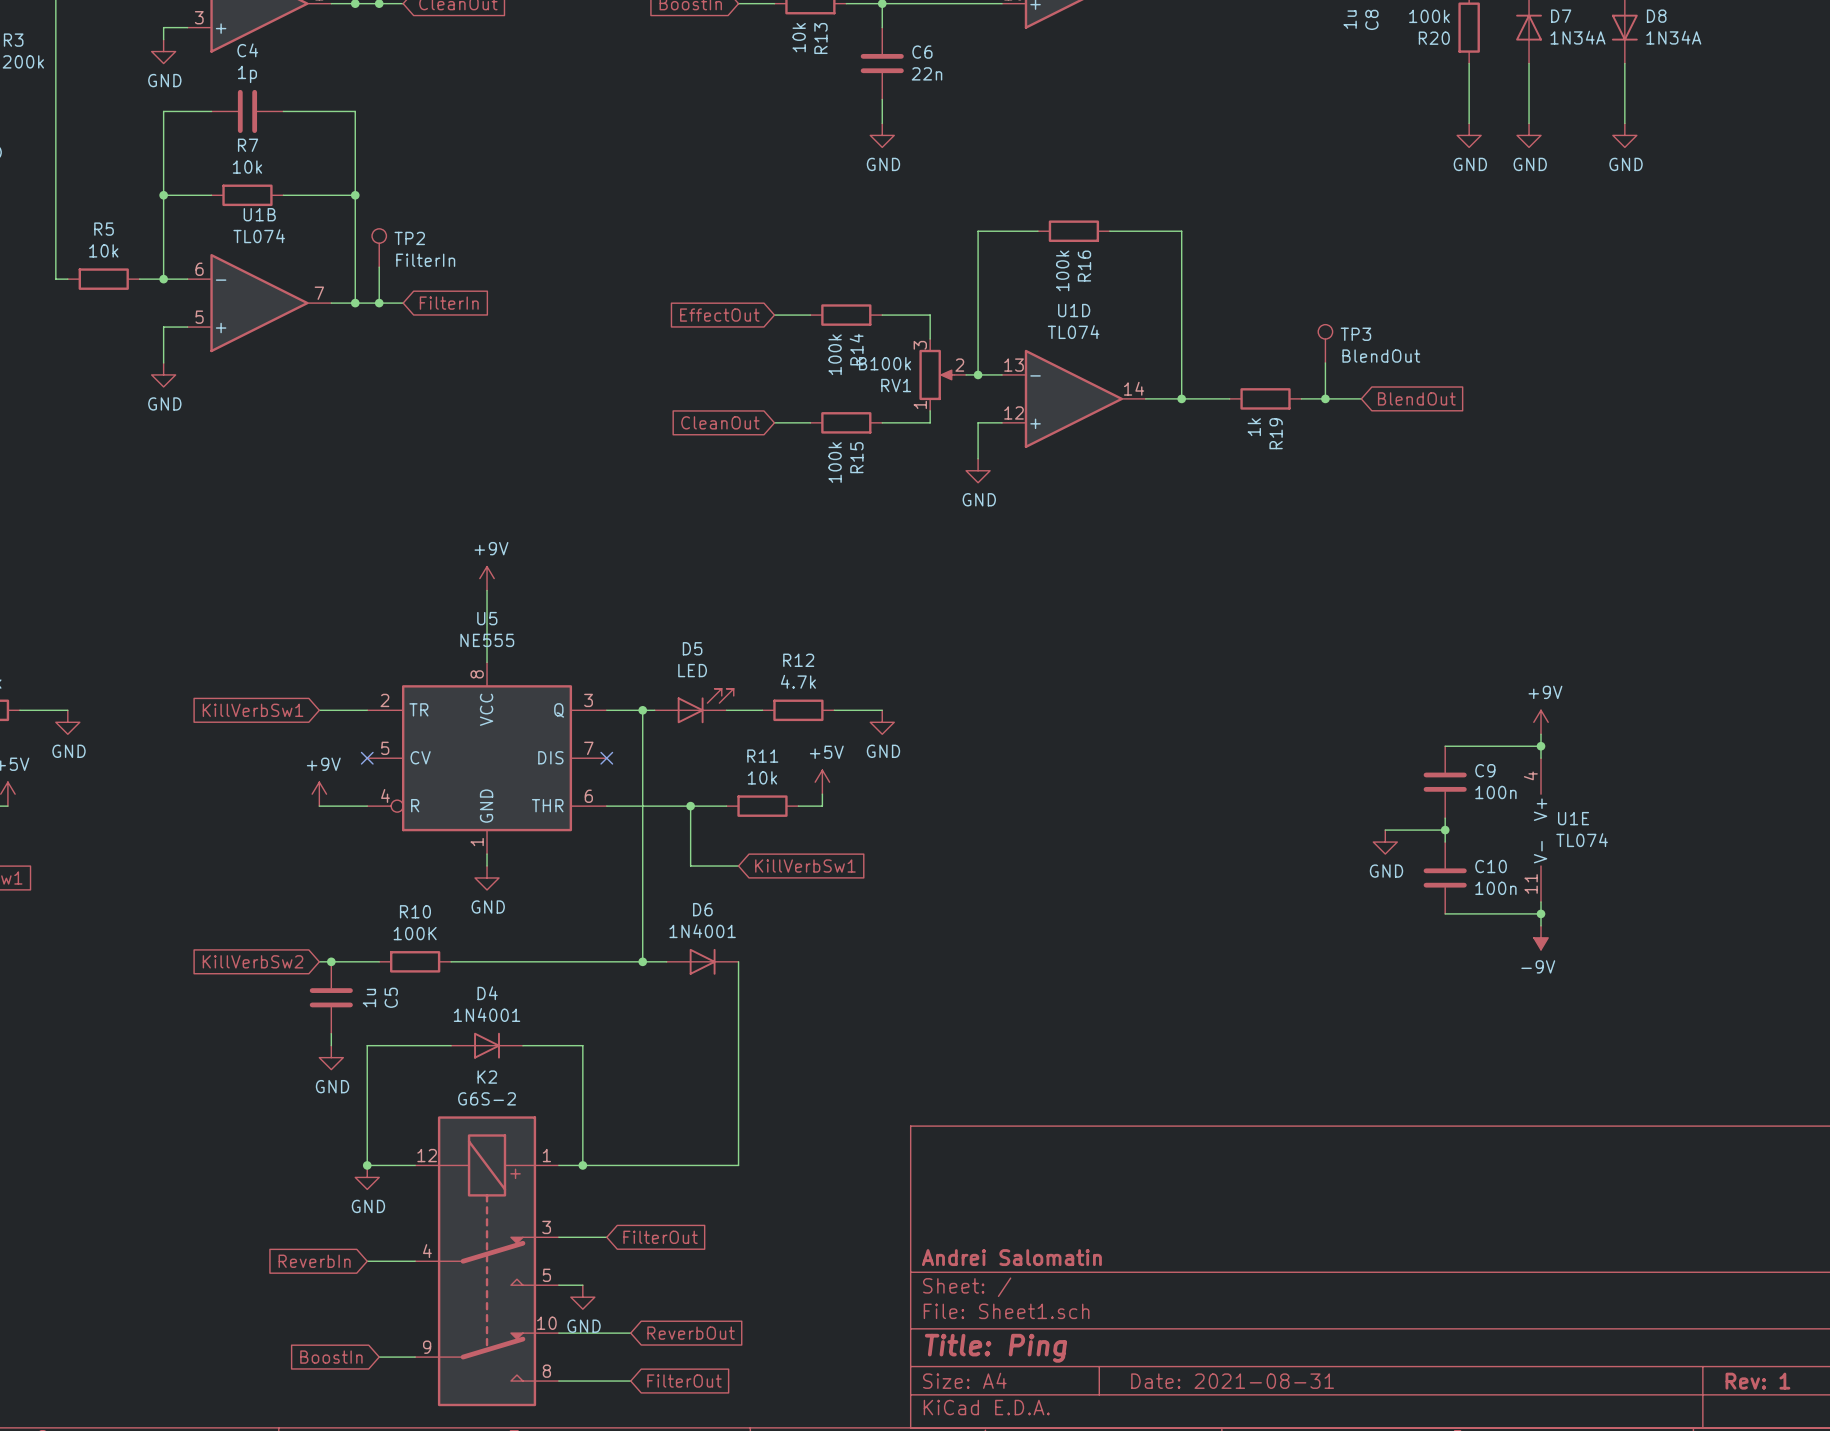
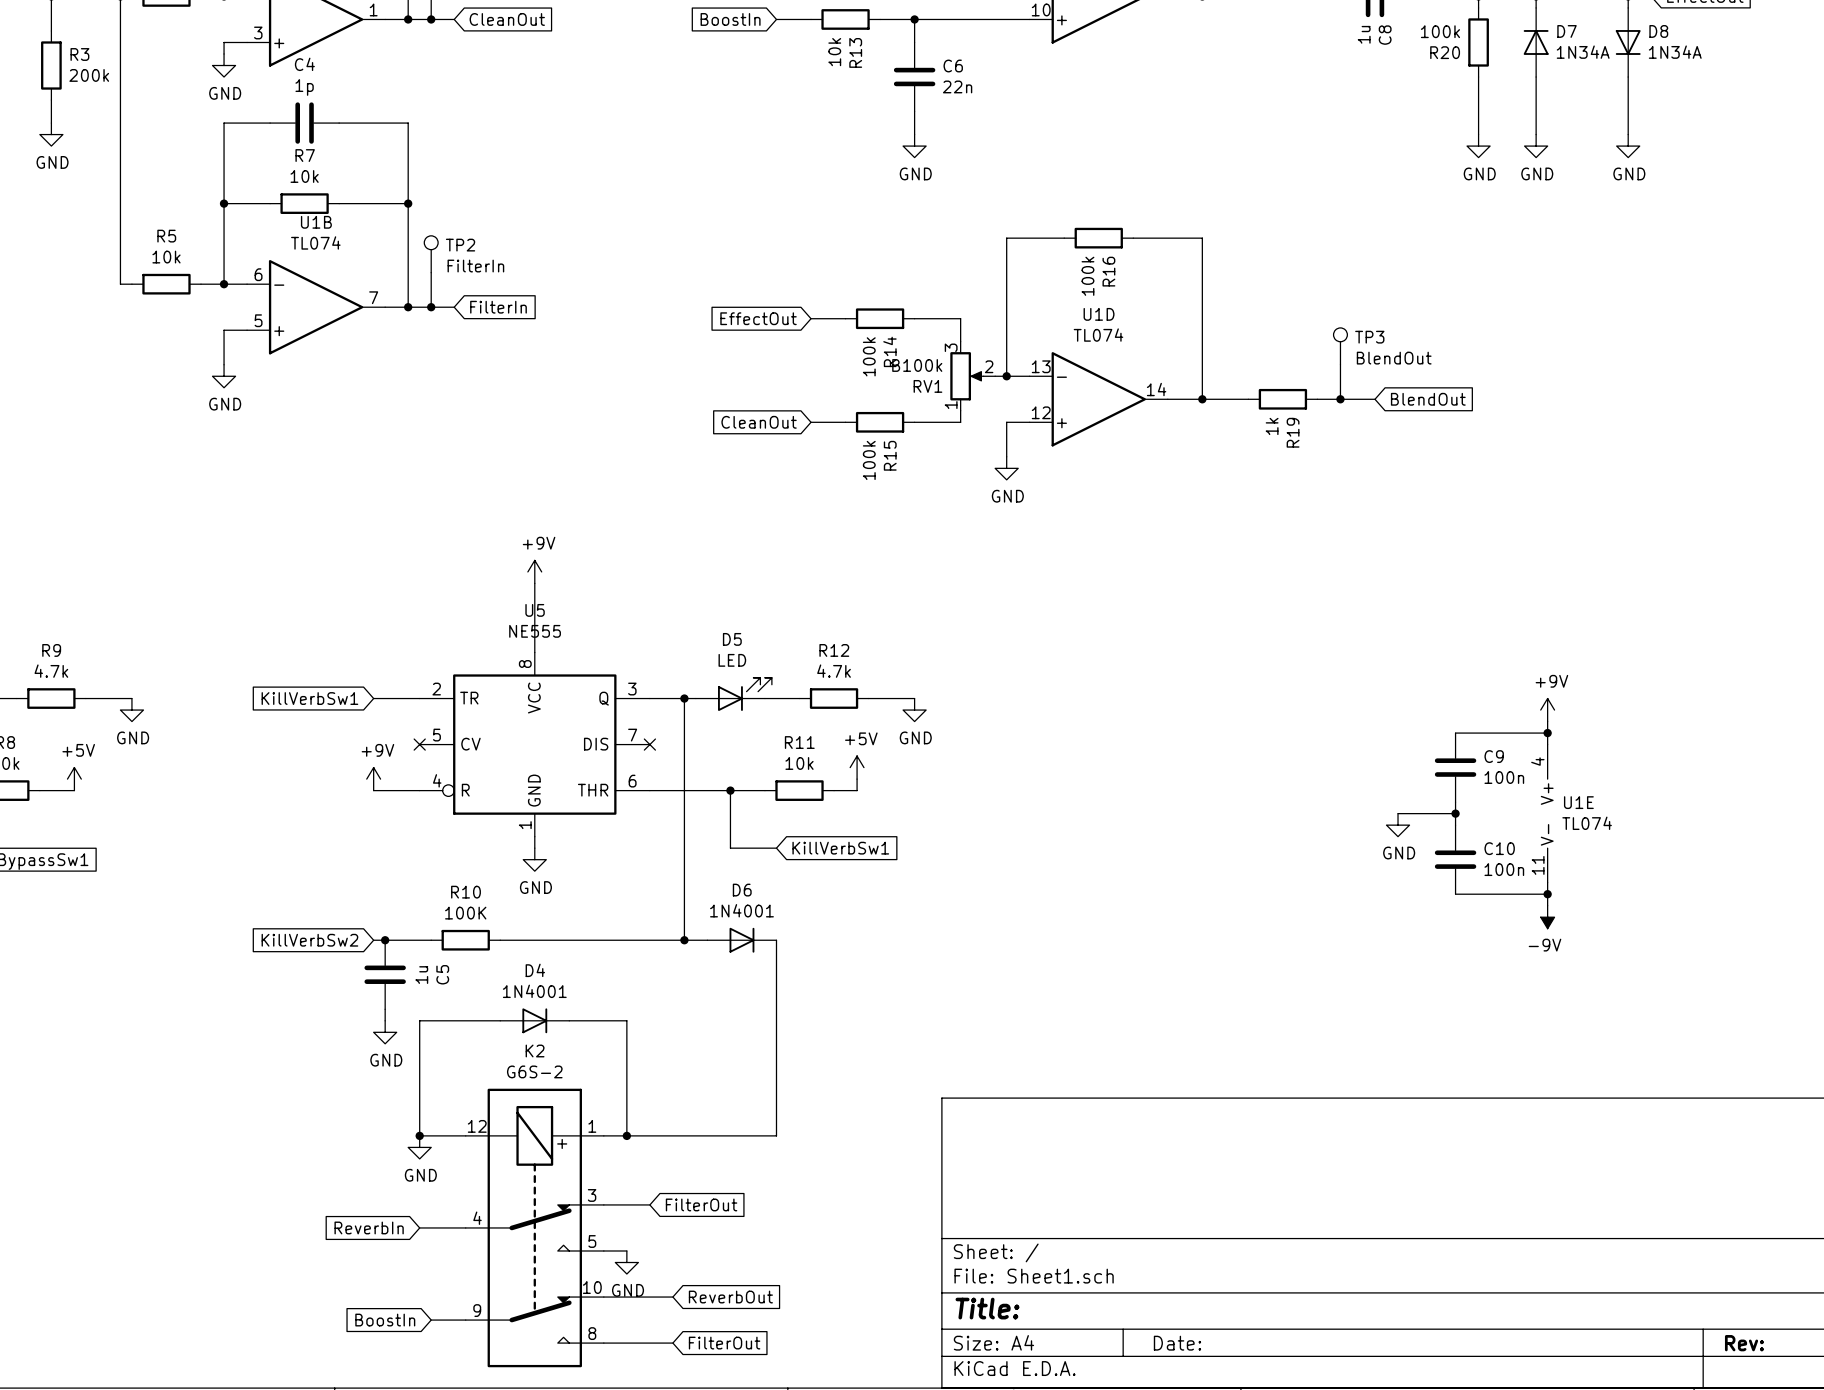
title block: Andrei Salomatin (1011, 1257) -> none
title block: Title: Ping (995, 1348) -> Title: (987, 1308)
title block: Date: 2021-08-31 (1232, 1381) -> Date: (1177, 1343)
title block: Rev: 1 (1757, 1381) -> Rev: (1744, 1343)

